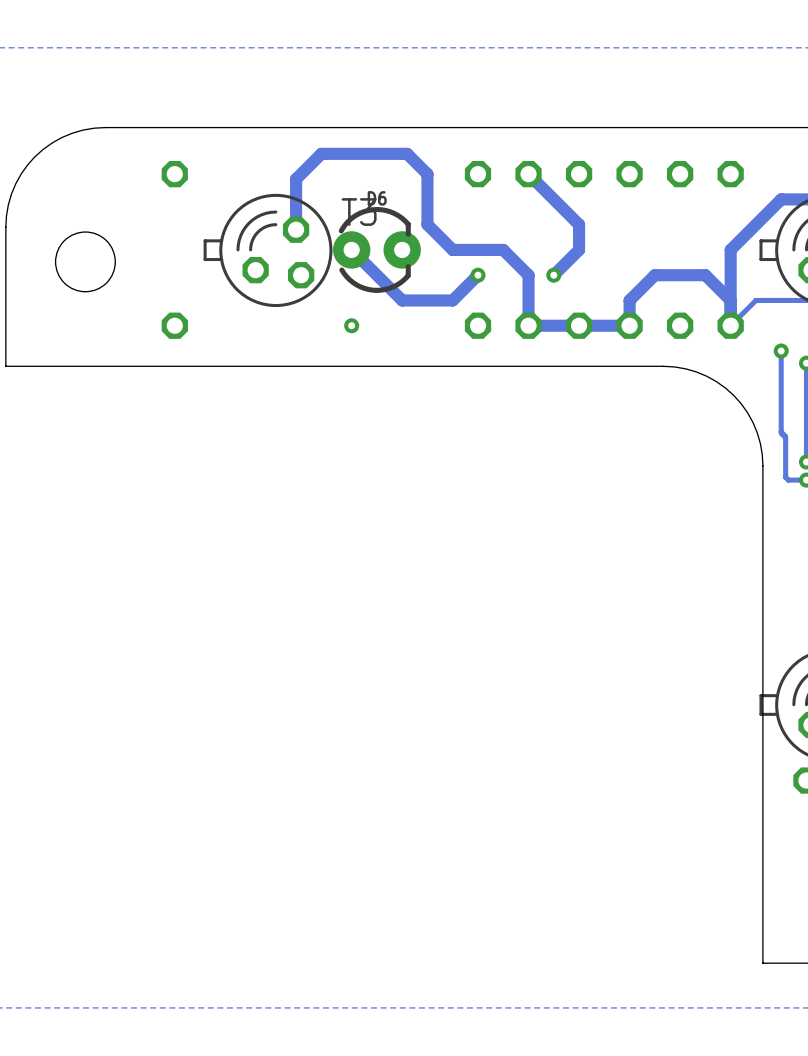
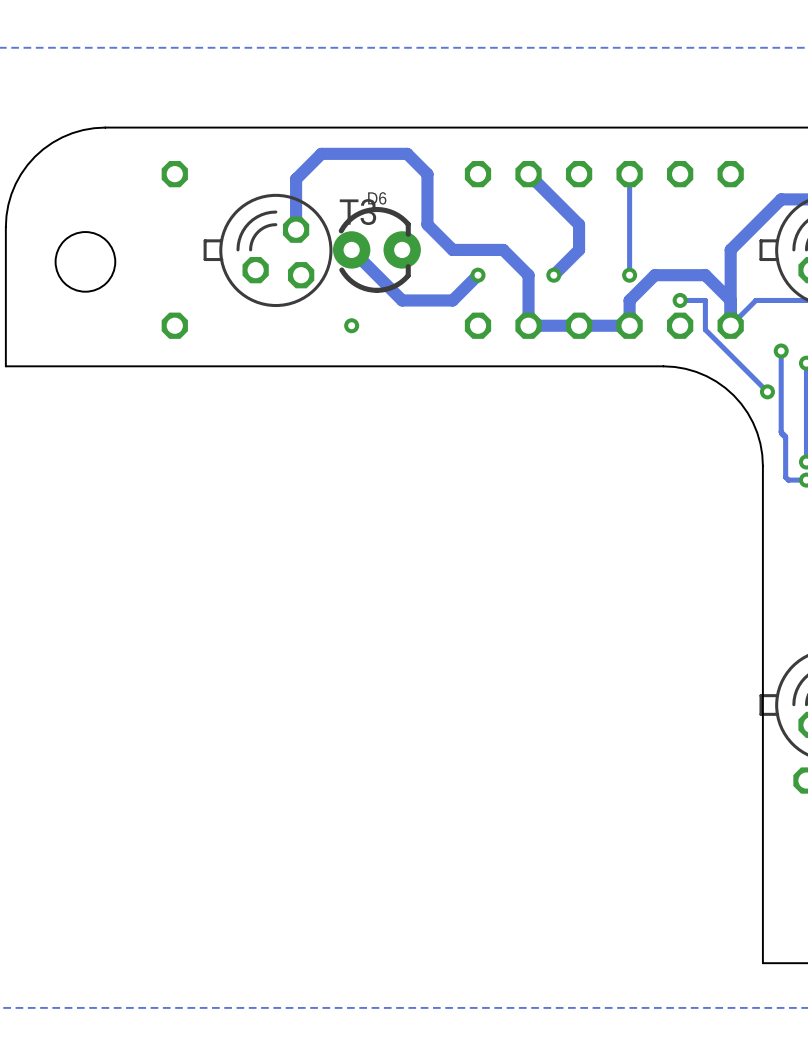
track: none -> (629, 174) (629, 275)
via: none -> (629, 275)
track: none -> (680, 300) (705, 300) (705, 329) (767, 391)
via: none -> (680, 300)
via: none -> (767, 391)

